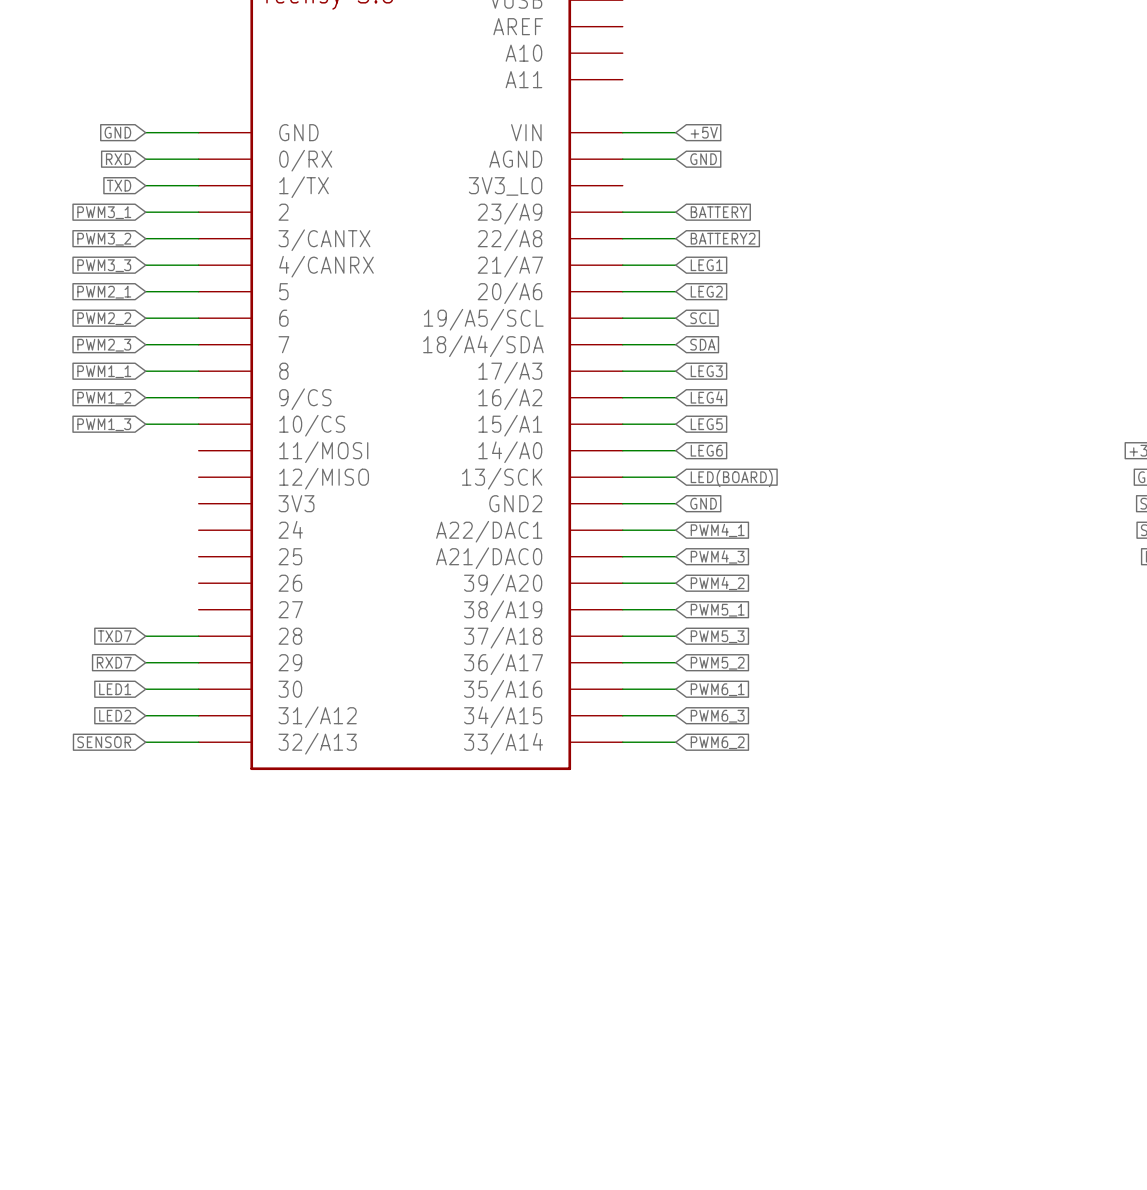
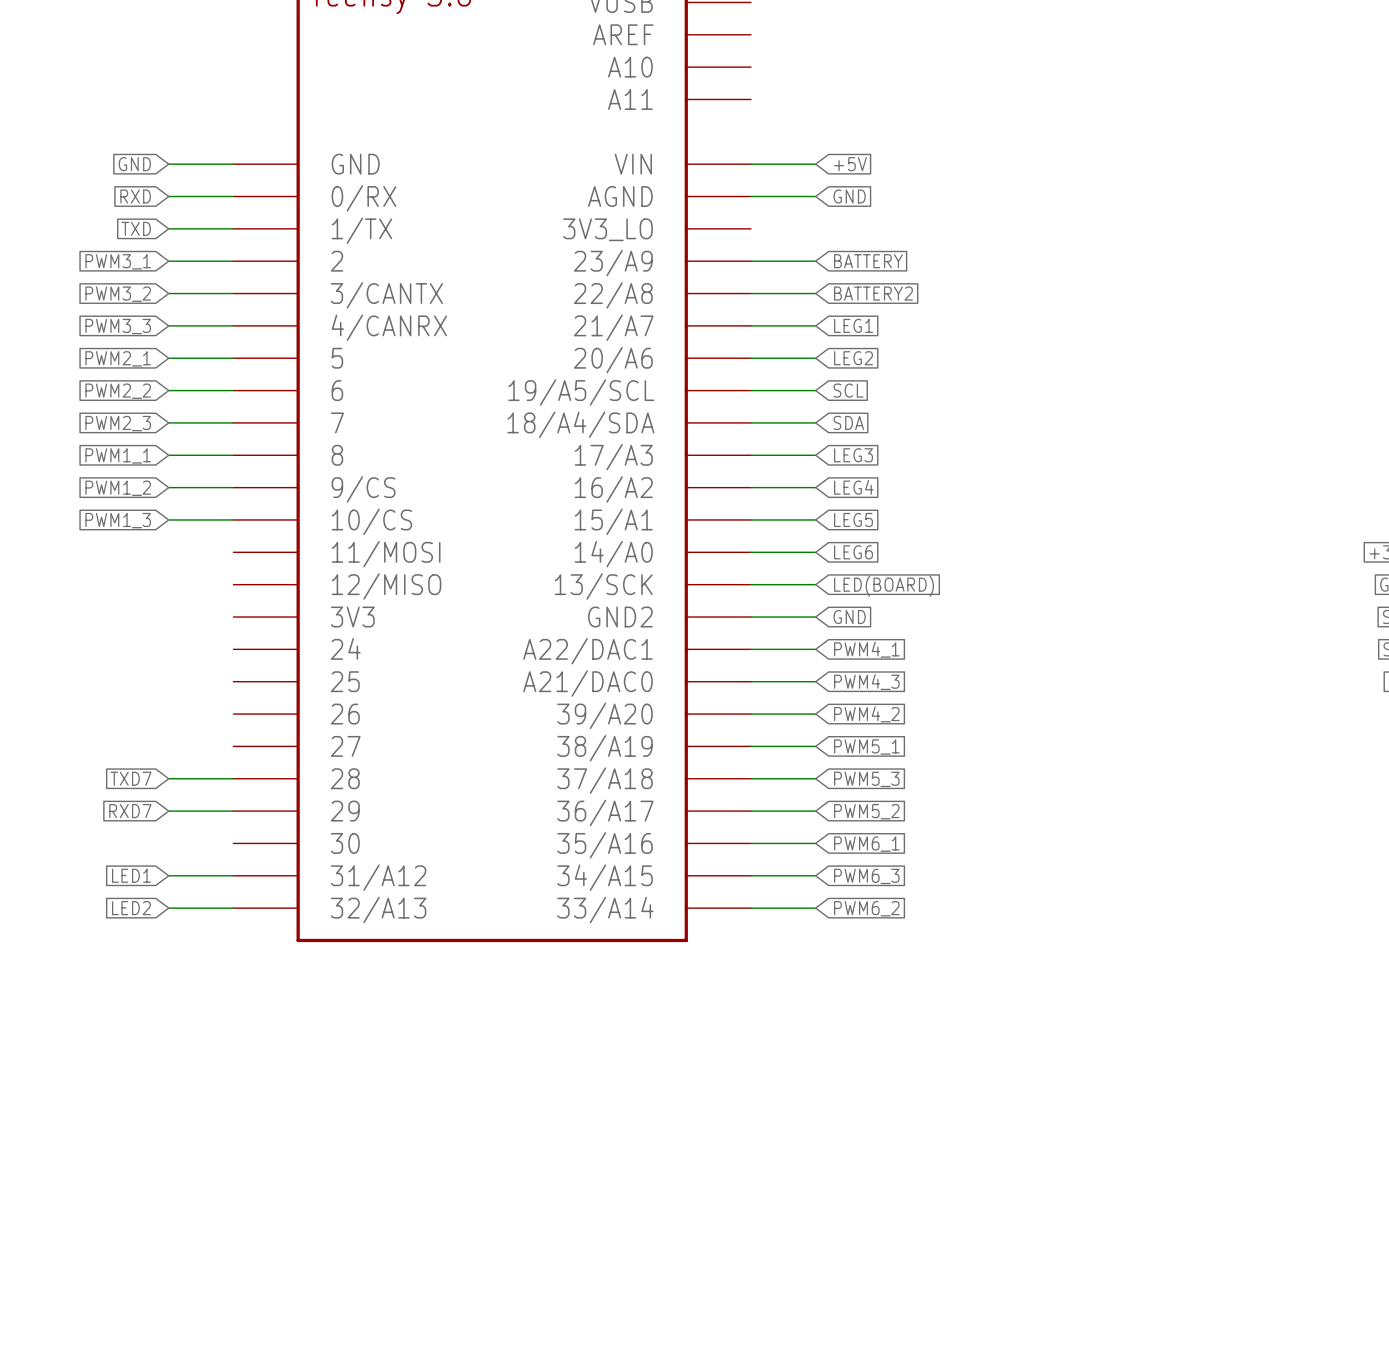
global label: LED1 (115, 689) -> none
wire: (145, 689) (198, 689) -> none
global label: LED2 (115, 715) -> LED1 (131, 875)
global label: SENSOR (104, 742) -> LED2 (131, 908)

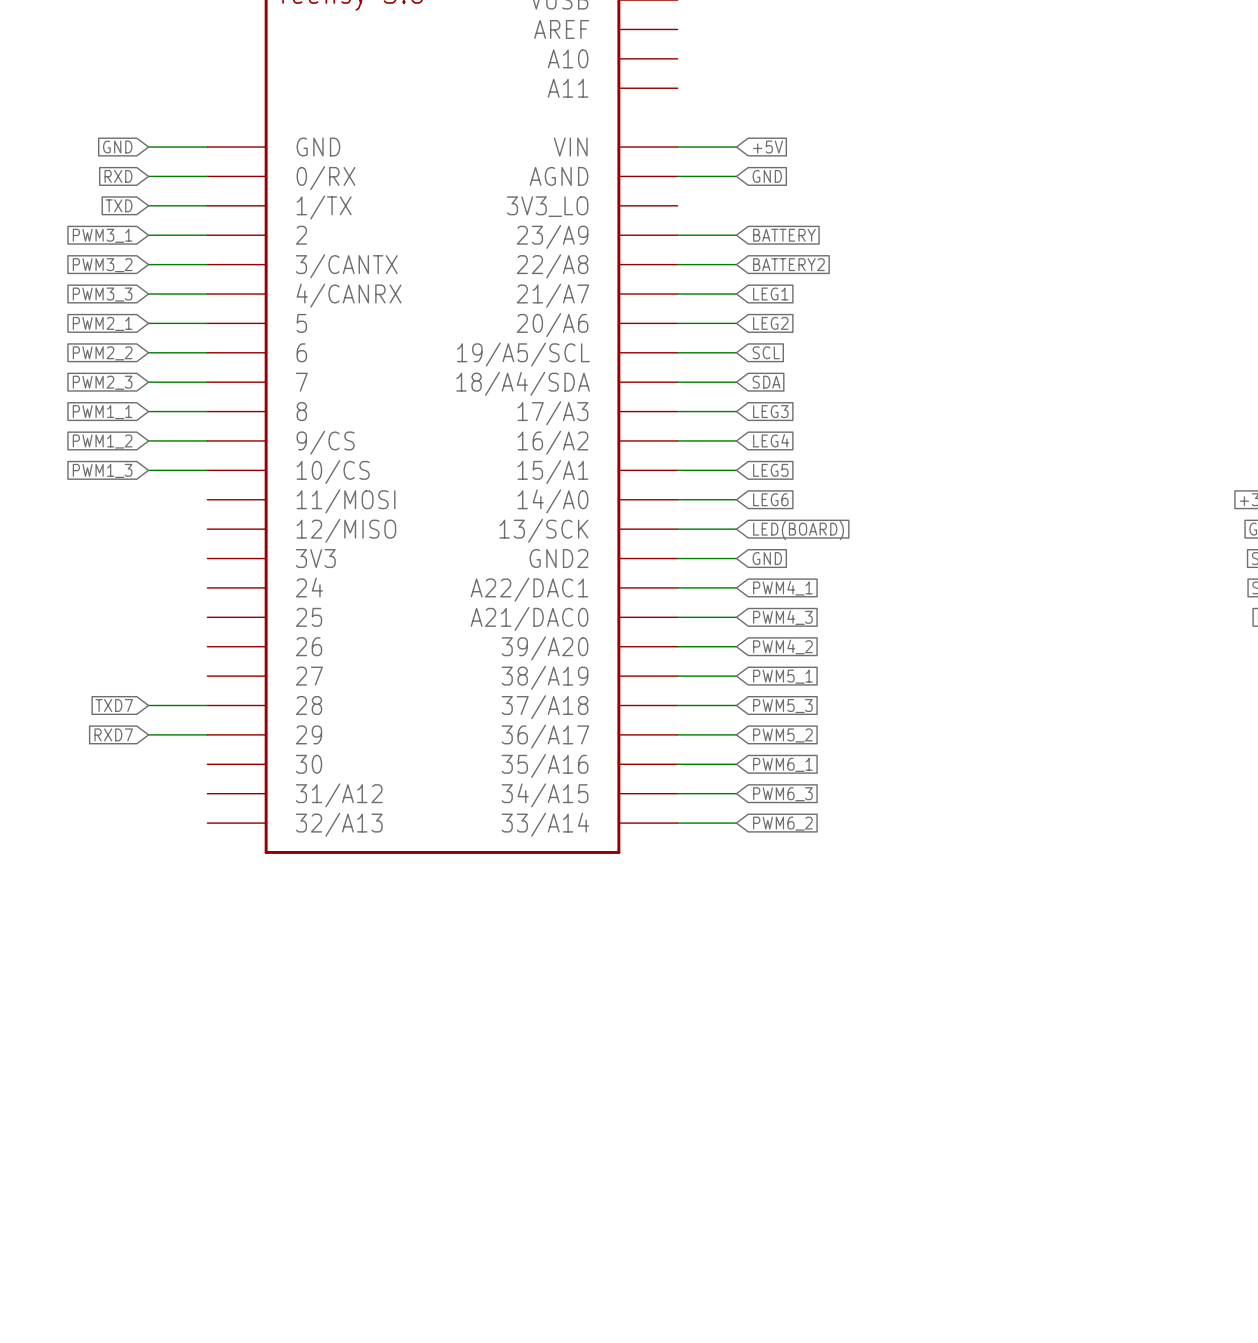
global label: LED1 (131, 875) -> none
wire: (168, 875) (233, 875) -> none
global label: LED2 (131, 908) -> none
wire: (168, 908) (233, 908) -> none

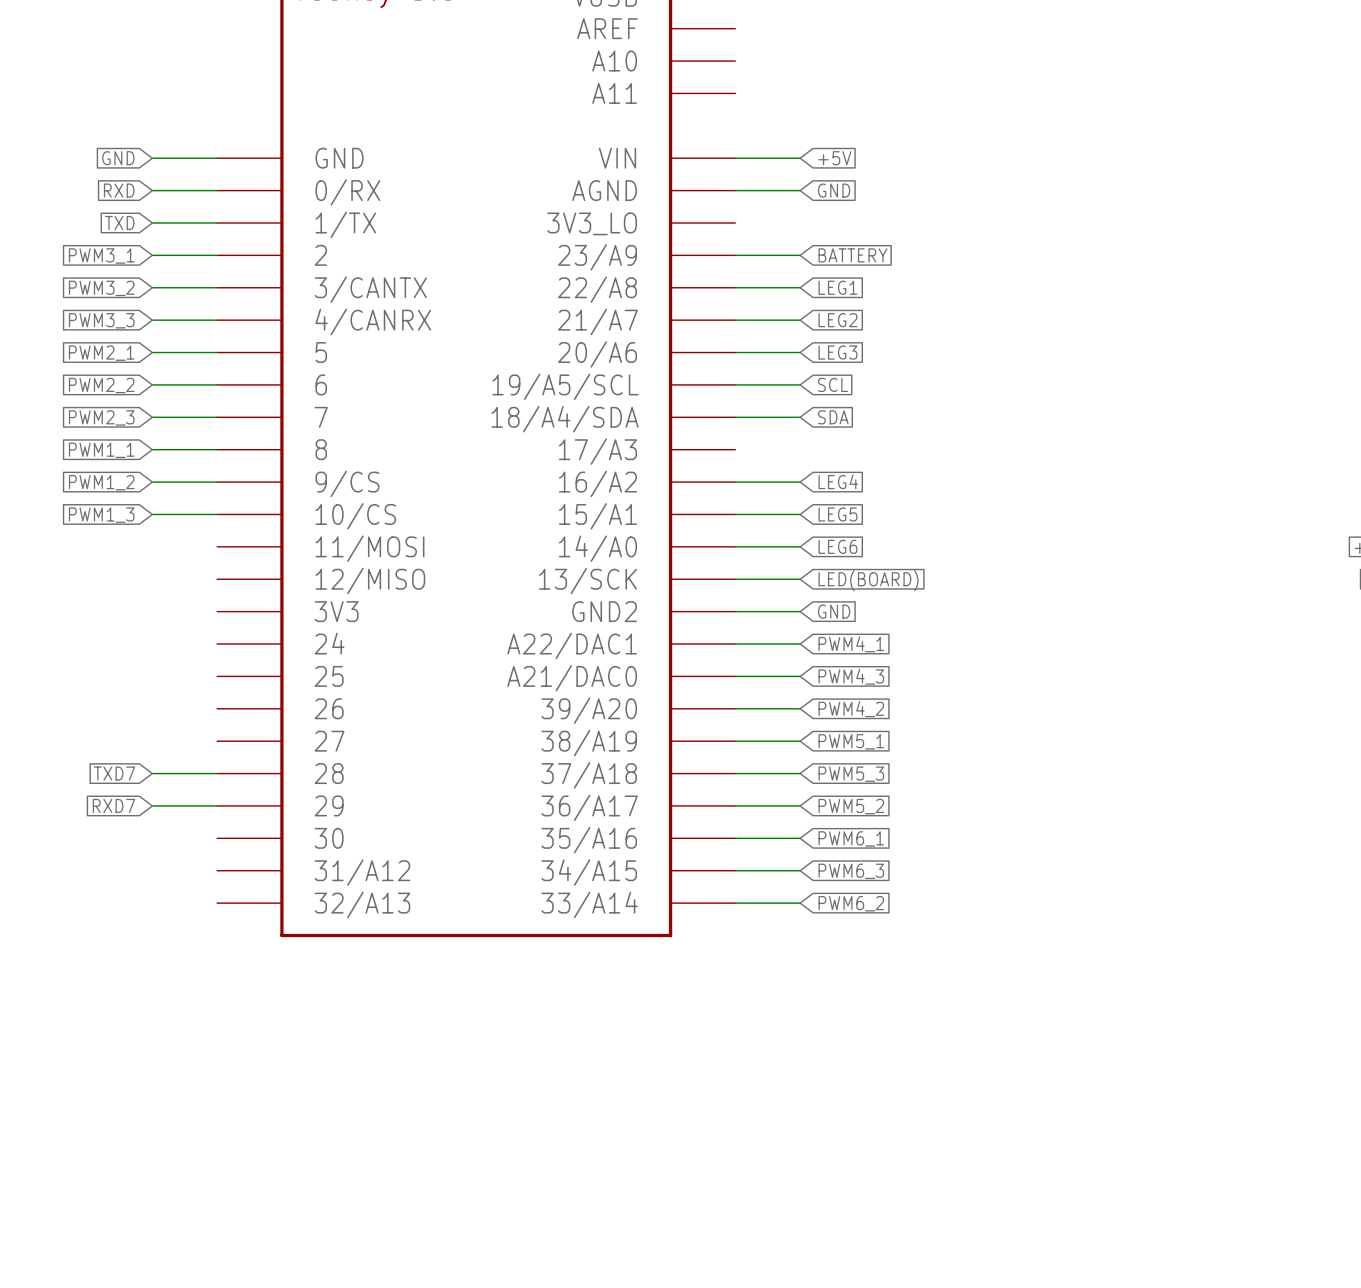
global label: BATTERY2 (788, 264) -> LEG1 (837, 287)
global label: LEG1 (770, 294) -> LEG2 (837, 320)
global label: LEG2 (770, 323) -> LEG3 (837, 352)
wire: (677, 411) (736, 411) -> none
global label: LEG3 (770, 411) -> none

